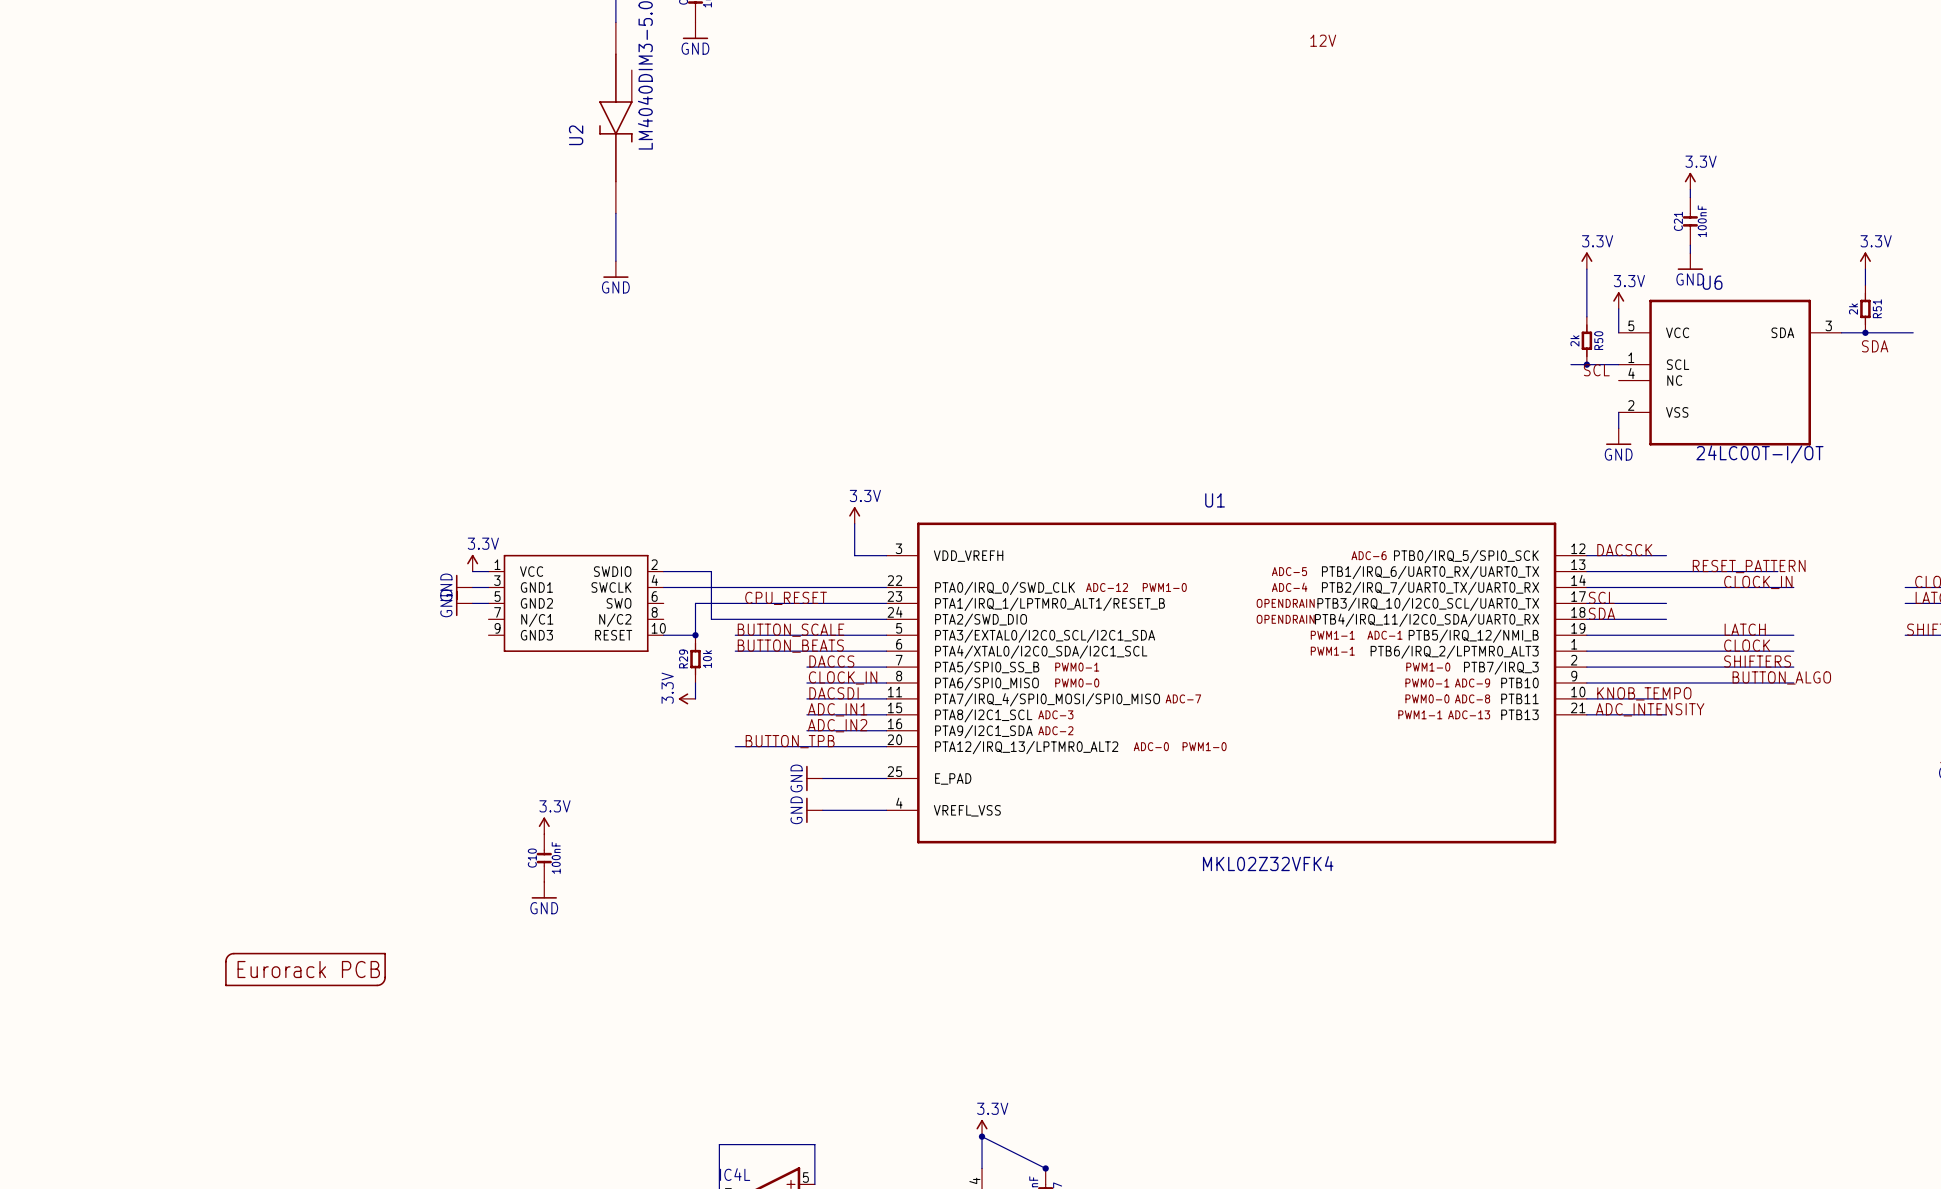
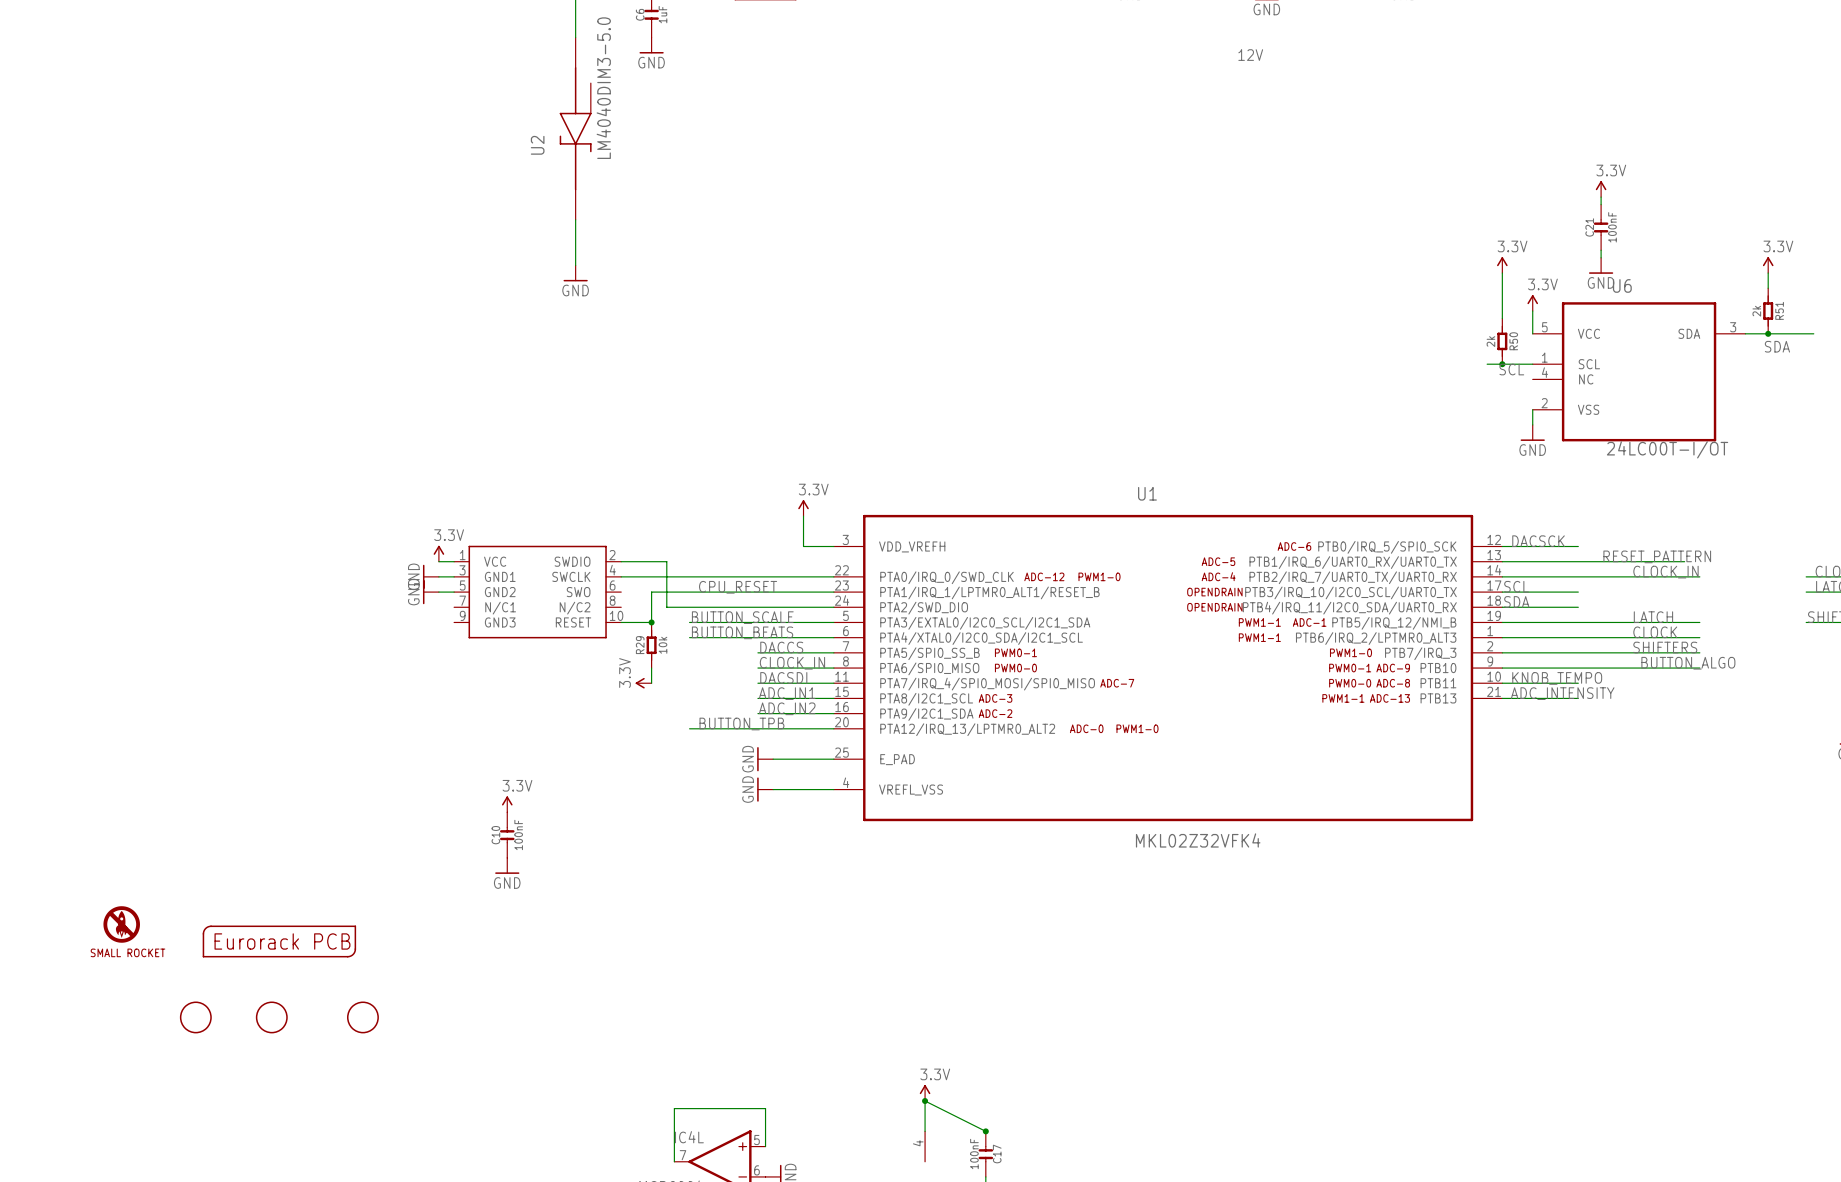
part: none -> (121, 924)
part: none -> (195, 1017)
part: none -> (271, 1017)
part: none -> (362, 1017)

